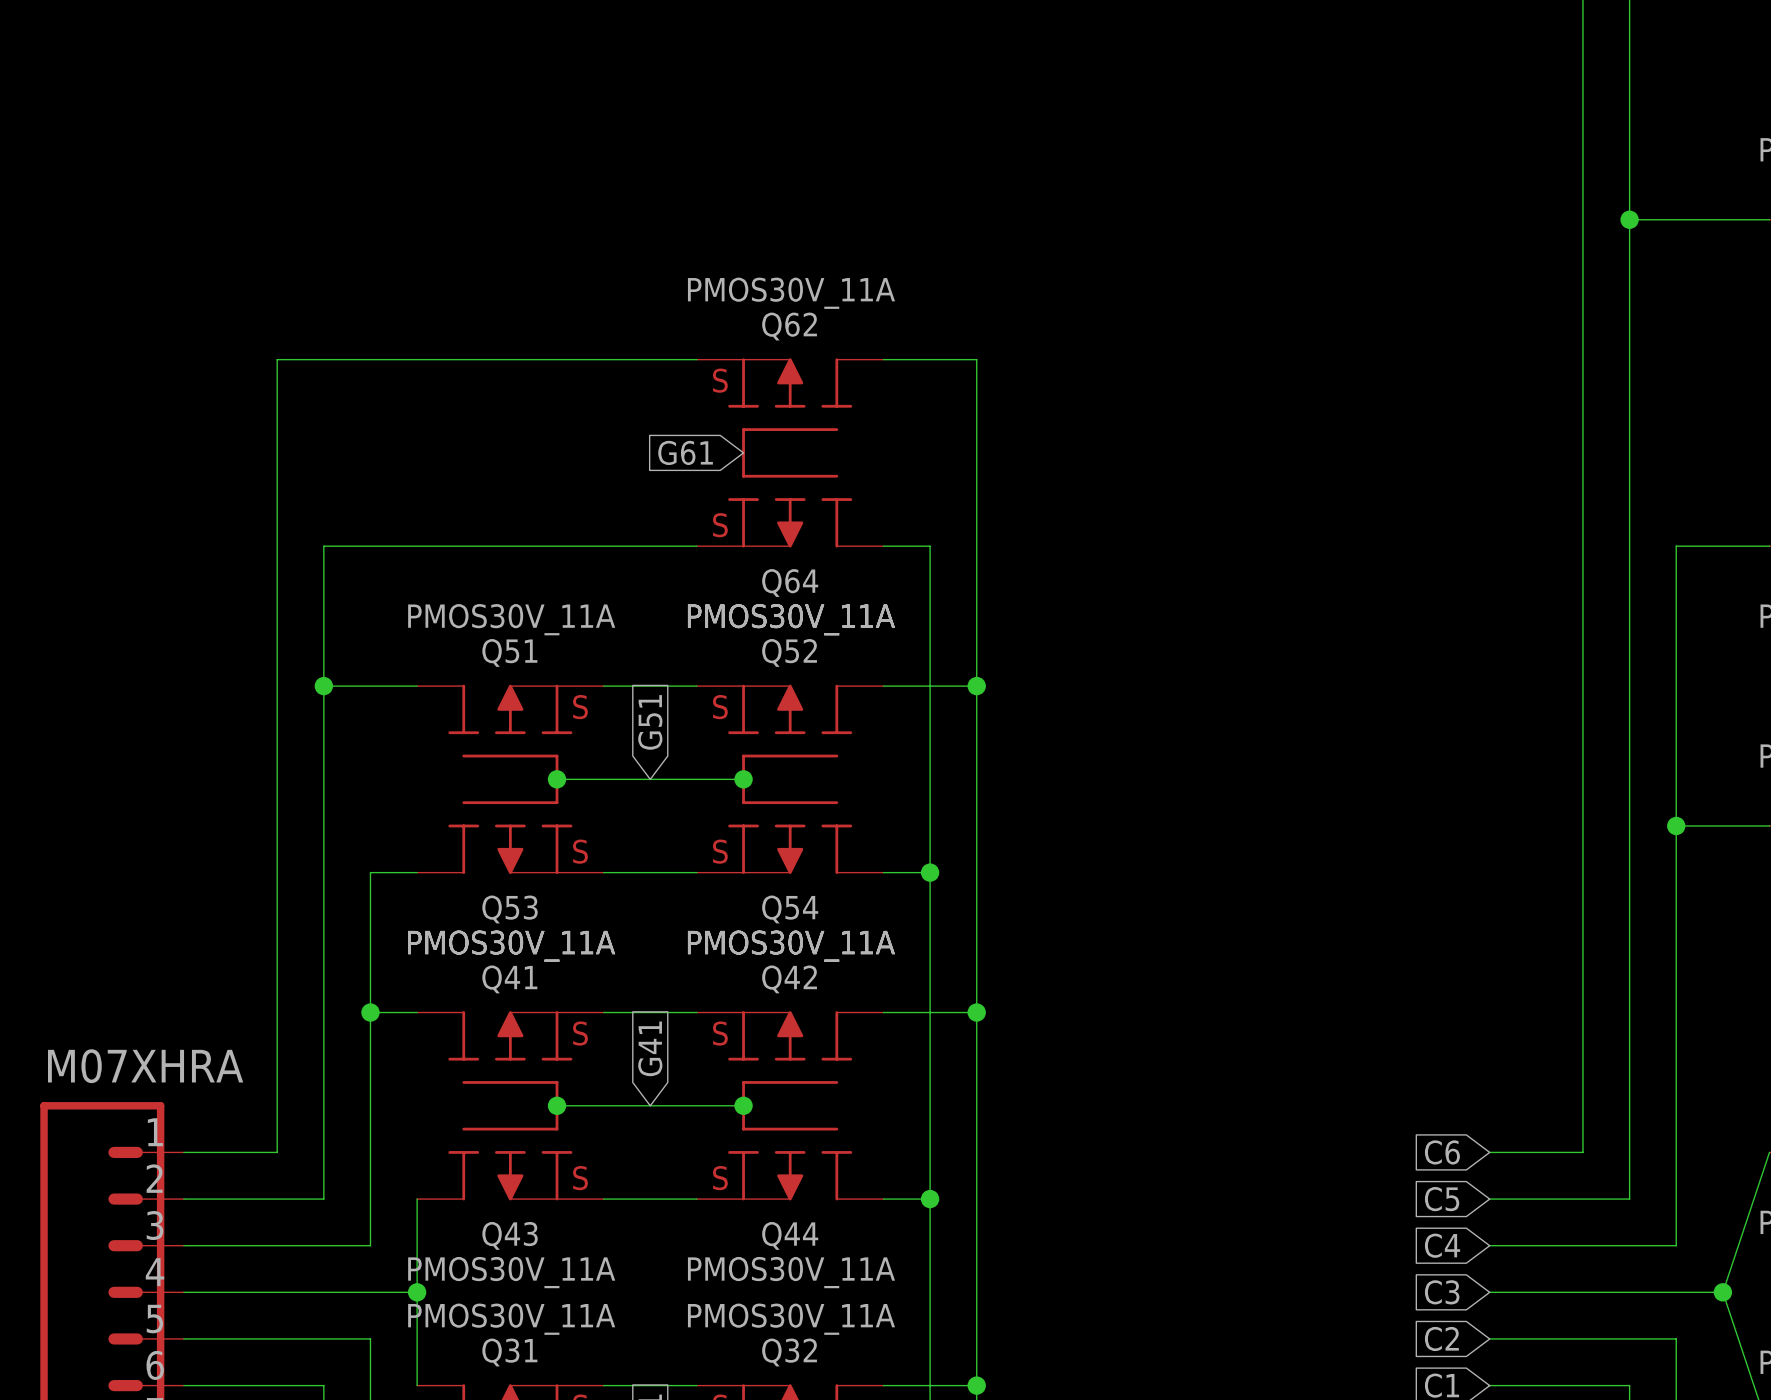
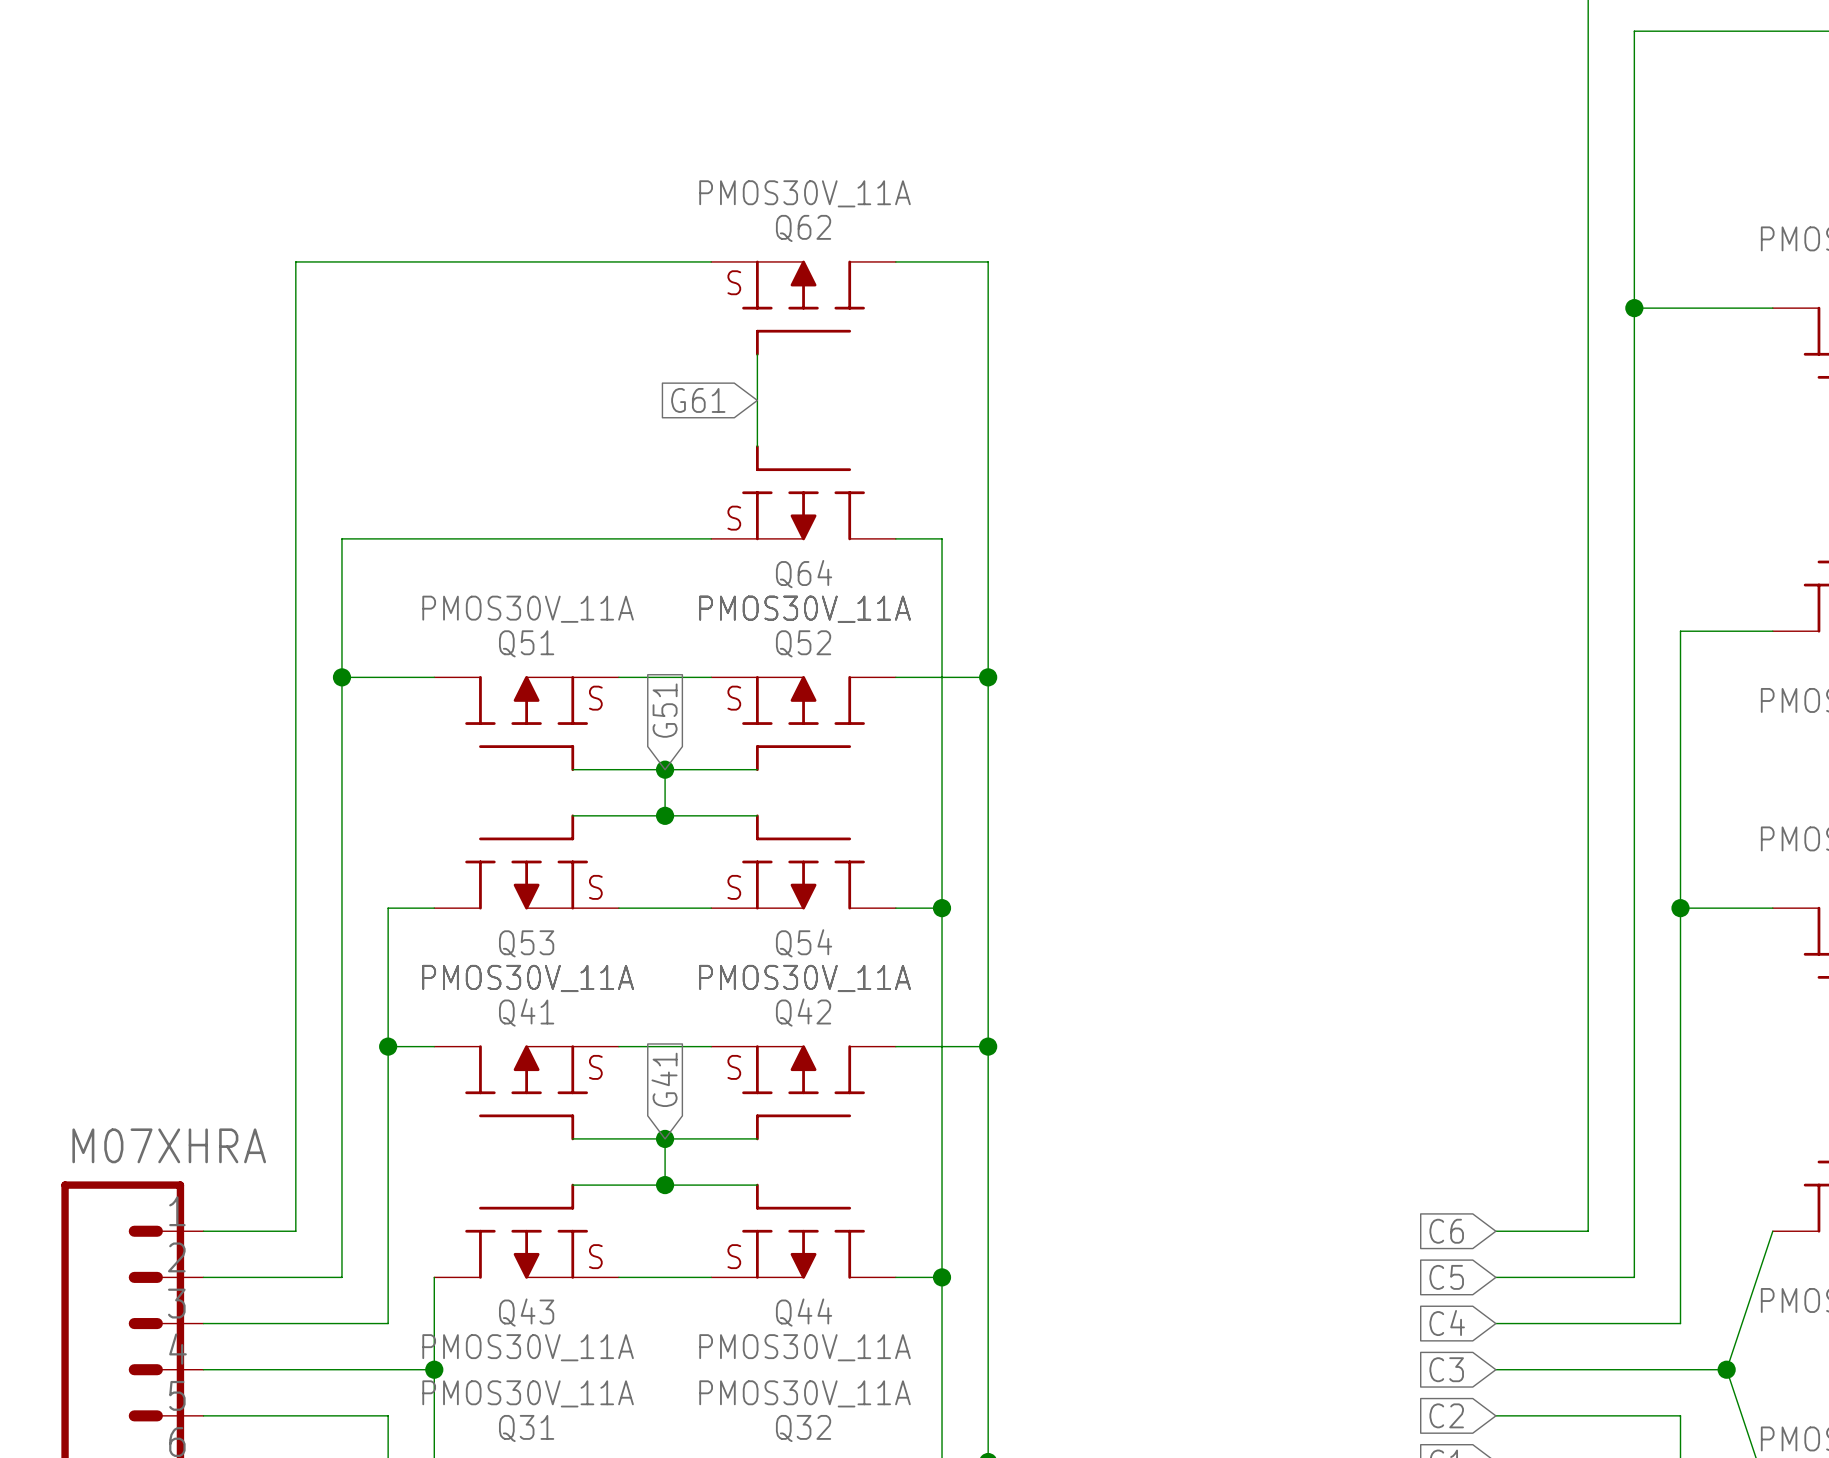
wire: none -> (757, 354) (757, 446)
wire: (277, 359) (696, 359) -> (295, 446) (295, 261) (711, 261)
wire: (883, 359) (976, 359) -> (895, 261) (988, 261) (988, 446)
Q62 position: (790, 406) -> (803, 308)
global label position: G61 (685, 452) -> G61 (698, 400)
Q64 position: (790, 499) -> (803, 492)
wire: (323, 546) (696, 546) -> (341, 631) (341, 538) (711, 538)
wire: (883, 546) (930, 546) -> (895, 538) (942, 538) (942, 631)
wire: none -> (618, 677) (711, 677)
junction: none -> (988, 677)
wire: (323, 686) (417, 686) -> (341, 677) (434, 677)
junction position: (323, 686) -> (341, 677)
wire: none -> (665, 769) (665, 815)
junction: none -> (665, 769)
wire: (883, 686) (976, 686) -> (895, 677) (988, 677)
junction: (976, 686) -> none
global label position: G51 (650, 722) -> G51 (665, 710)
Q51 position: (510, 732) -> (526, 723)
junction: none -> (665, 815)
Q52 position: (790, 732) -> (803, 723)
wire: (557, 779) (743, 779) -> (572, 815) (757, 815)
junction: (557, 779) -> none
junction: (743, 779) -> none
Q53 position: (510, 825) -> (526, 861)
Q54 position: (790, 825) -> (803, 861)
wire: (370, 872) (417, 872) -> (388, 954) (388, 908) (434, 908)
wire: (603, 872) (696, 872) -> (618, 908) (711, 908)
wire: (883, 872) (930, 872) -> (895, 908) (942, 908)
junction position: (930, 872) -> (942, 908)
wire: (370, 1012) (417, 1012) -> (388, 1046) (434, 1046)
junction position: (370, 1012) -> (388, 1046)
wire: (603, 1012) (696, 1012) -> (618, 1046) (711, 1046)
wire: (883, 1012) (976, 1012) -> (895, 1046) (988, 1046)
junction position: (976, 1012) -> (988, 1046)
global label position: G41 (650, 1048) -> G41 (664, 1079)
Q41 position: (510, 1059) -> (526, 1092)
wire: none -> (572, 1138) (757, 1138)
wire: none -> (665, 1138) (665, 1185)
junction: none -> (665, 1138)
Q42 position: (790, 1059) -> (803, 1092)
junction: (557, 1105) -> none
junction: none -> (665, 1185)
junction: (743, 1105) -> none

